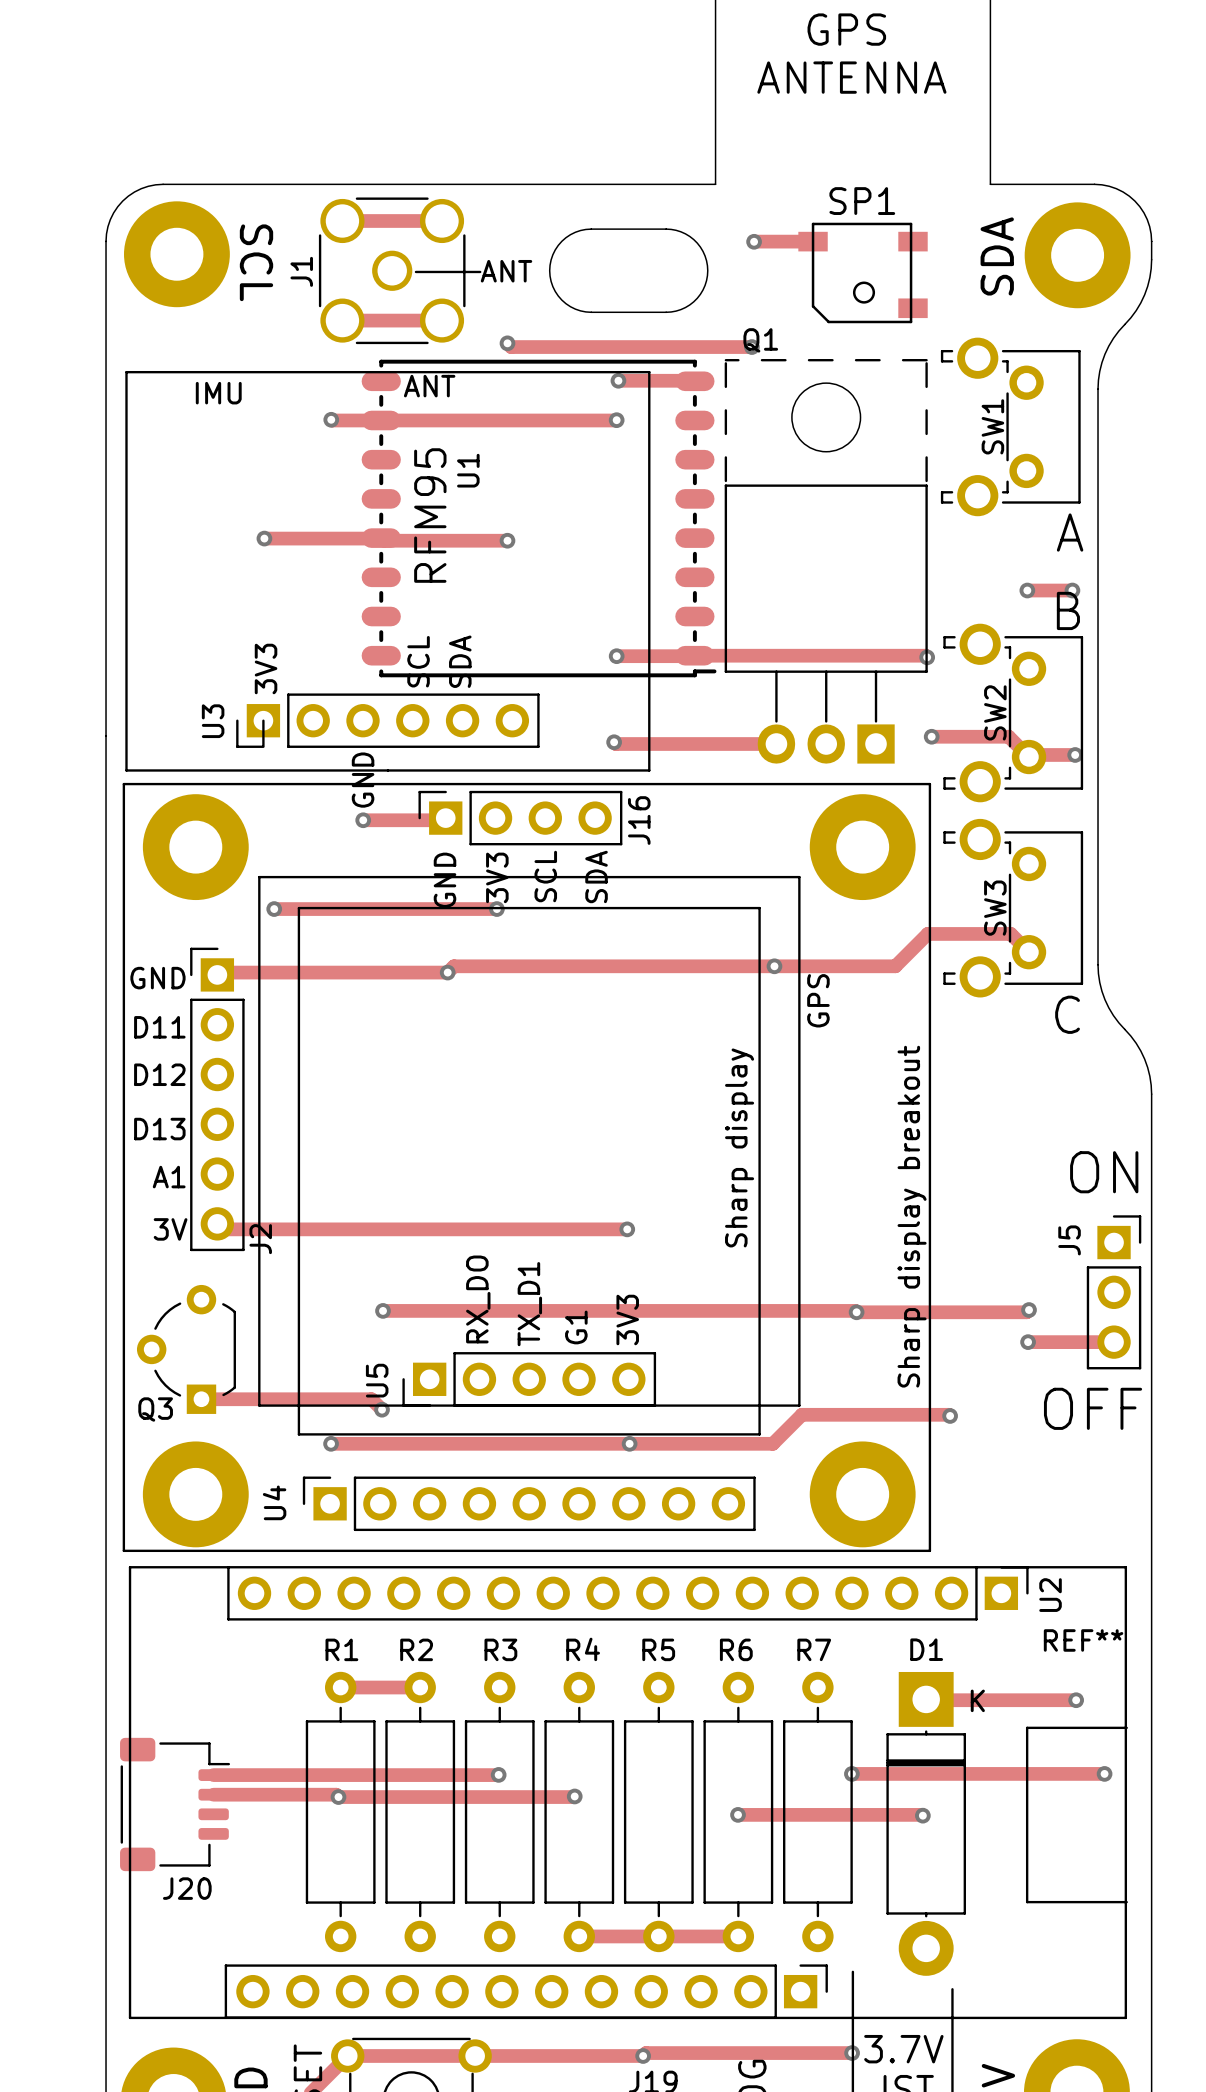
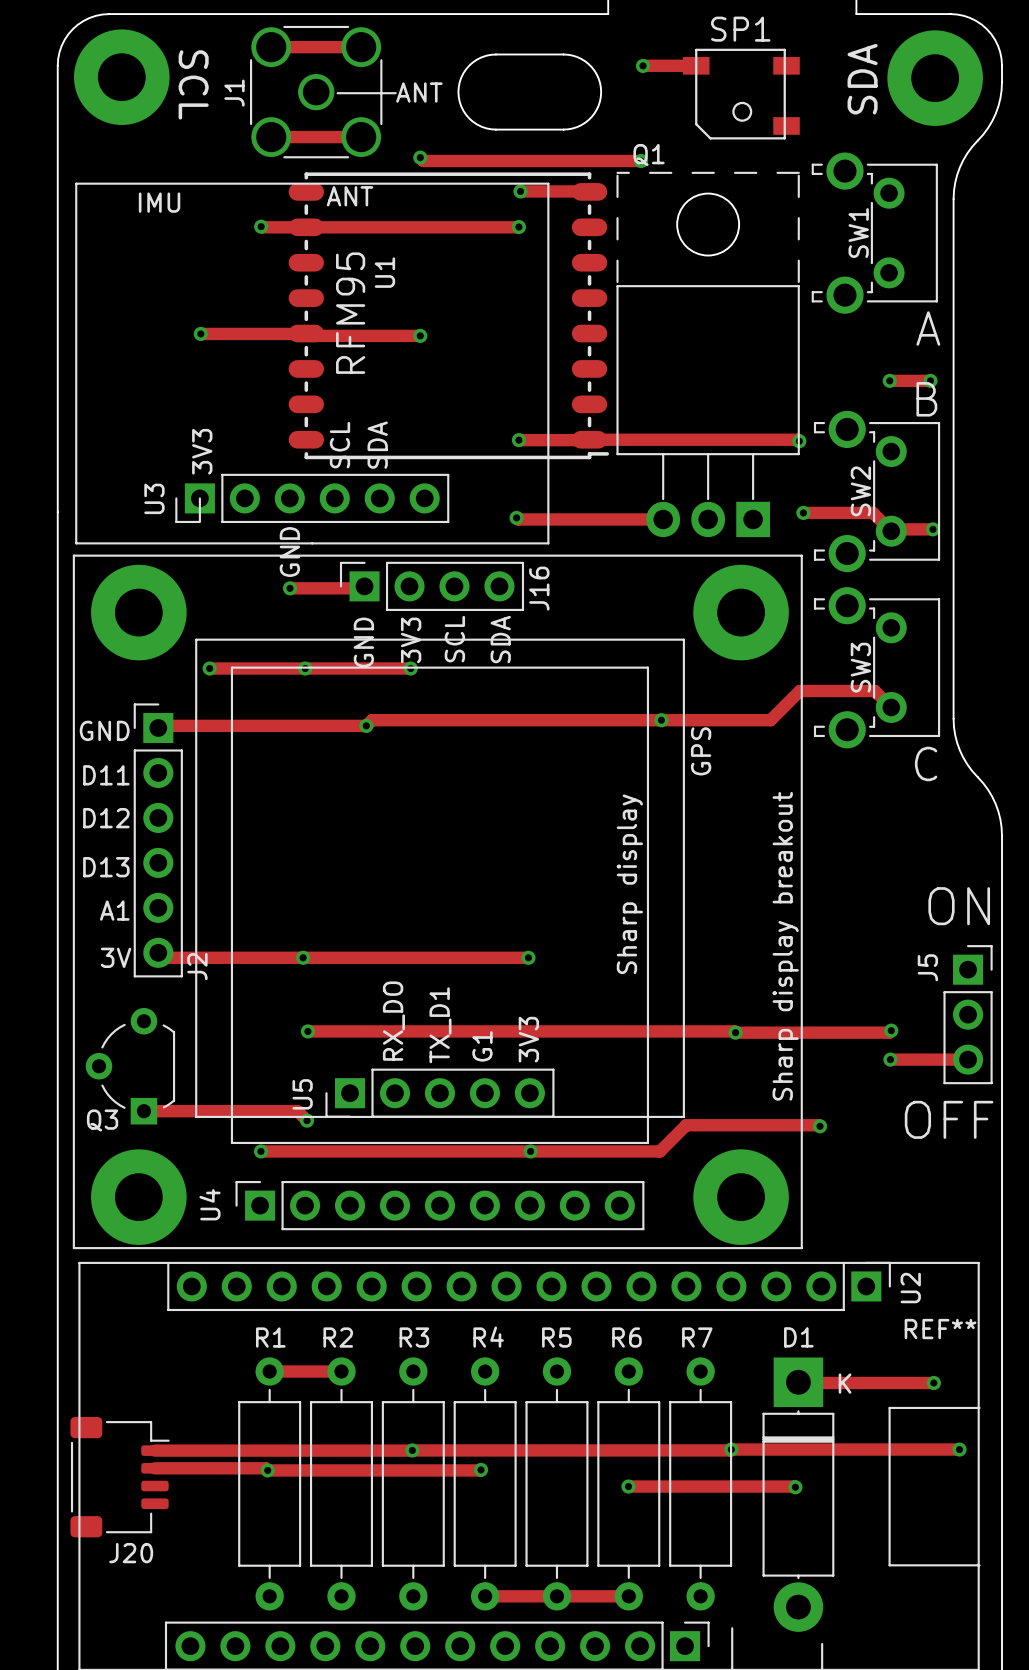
via: none -> (305, 668)
via: none -> (303, 957)
track: none -> (731, 1449) (412, 1450)

